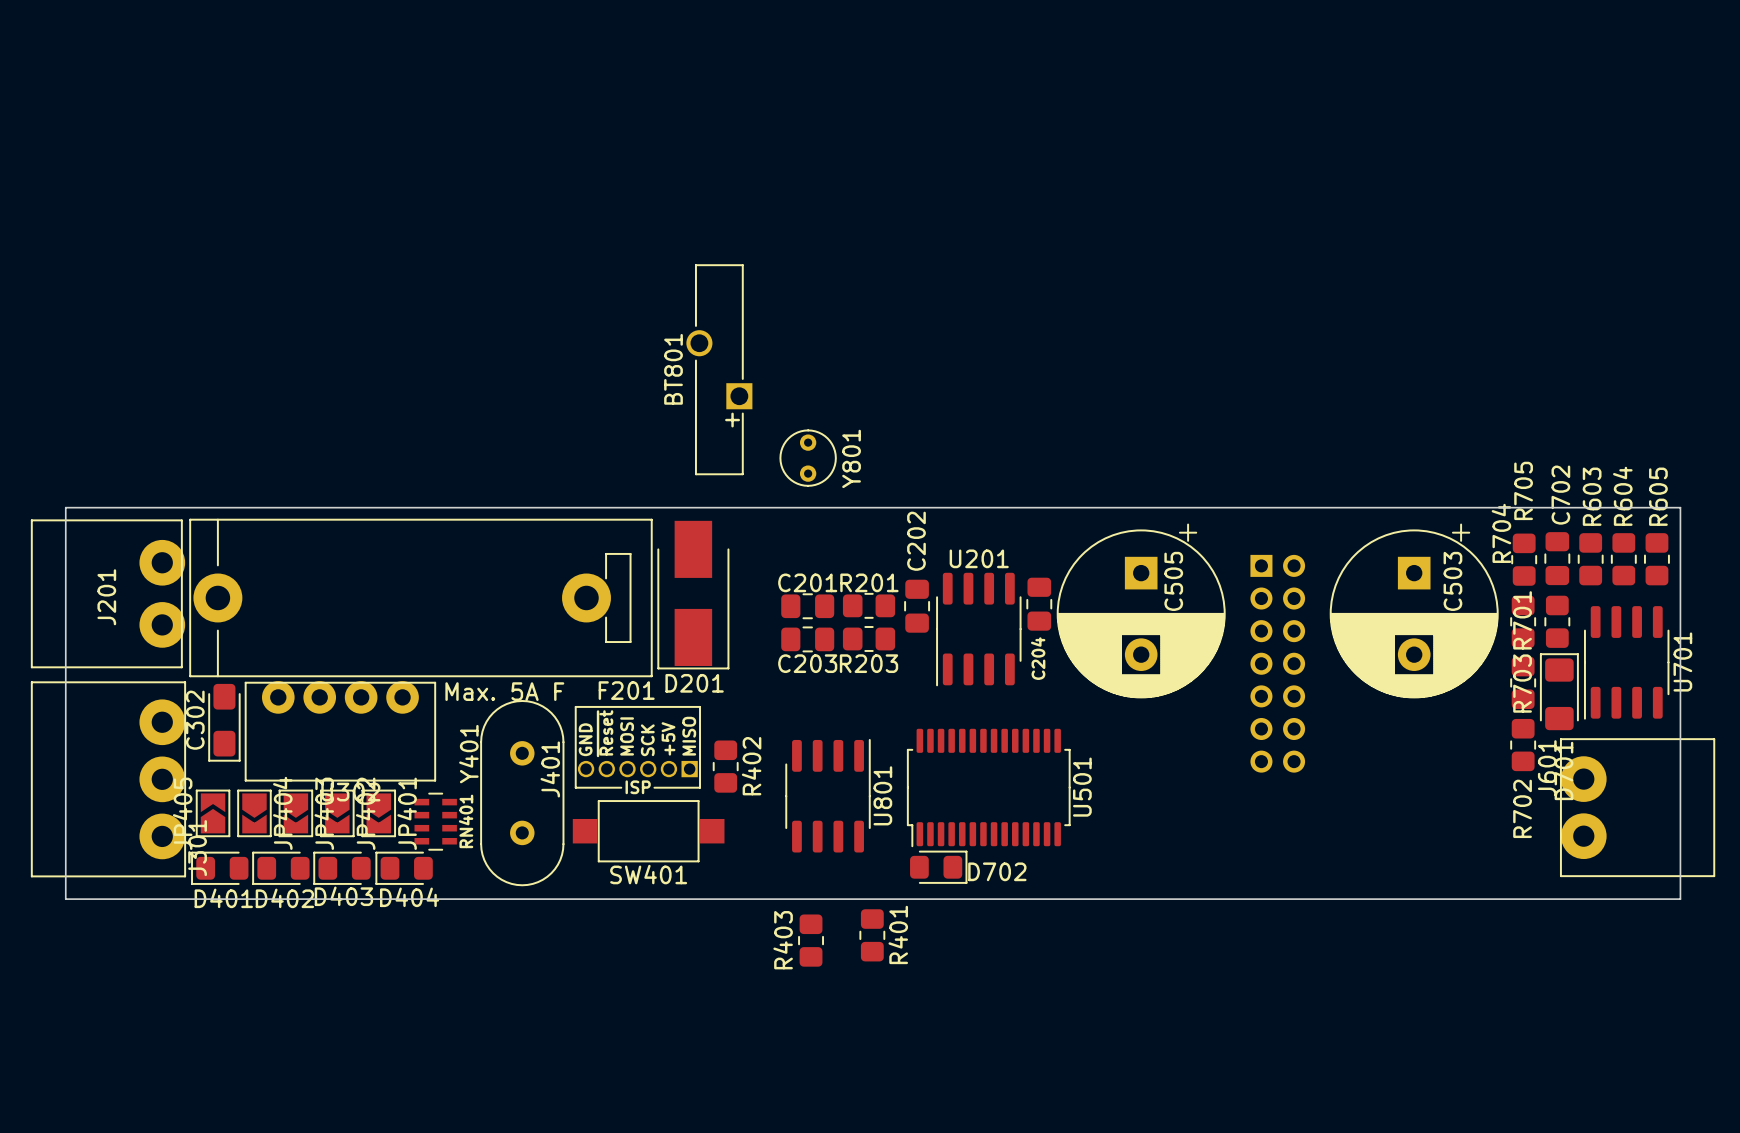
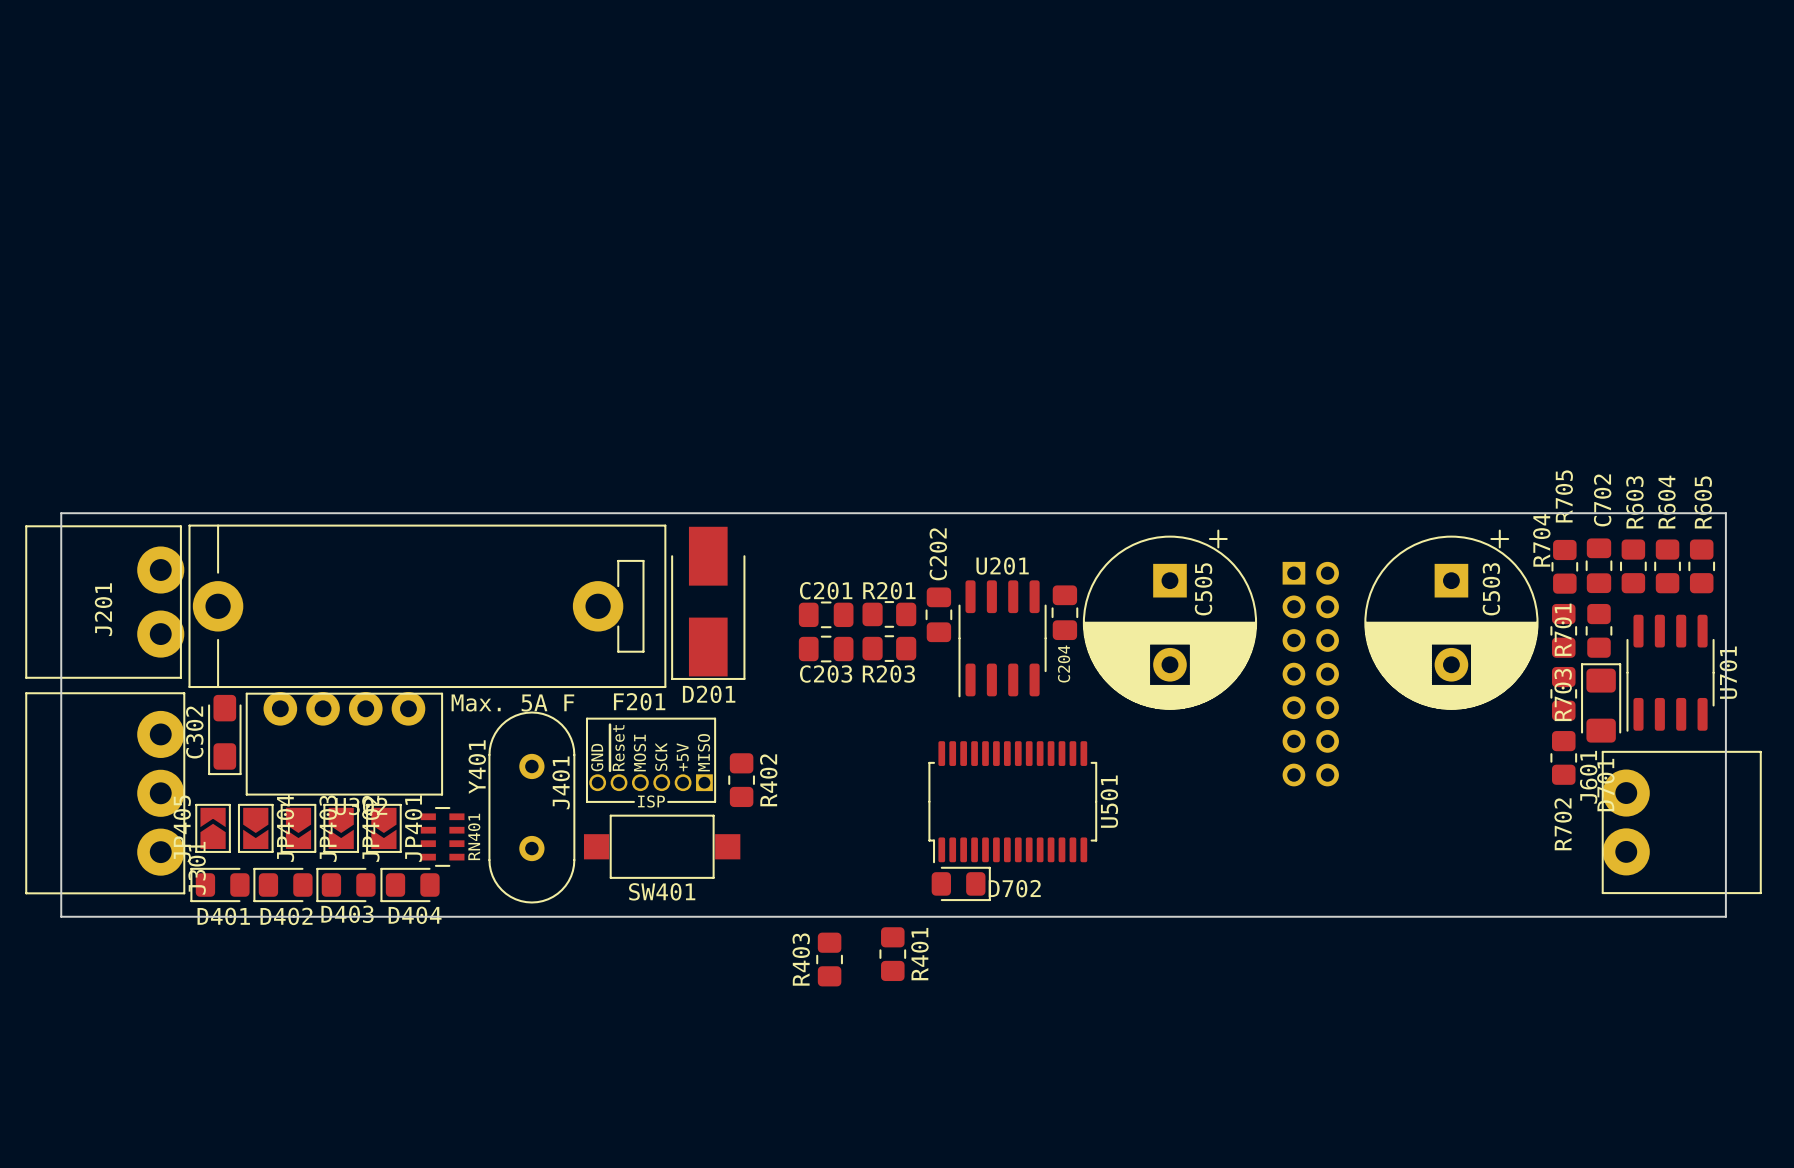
BT801: (719, 369) -> none
Y801: (808, 458) -> none
U801: (828, 795) -> none

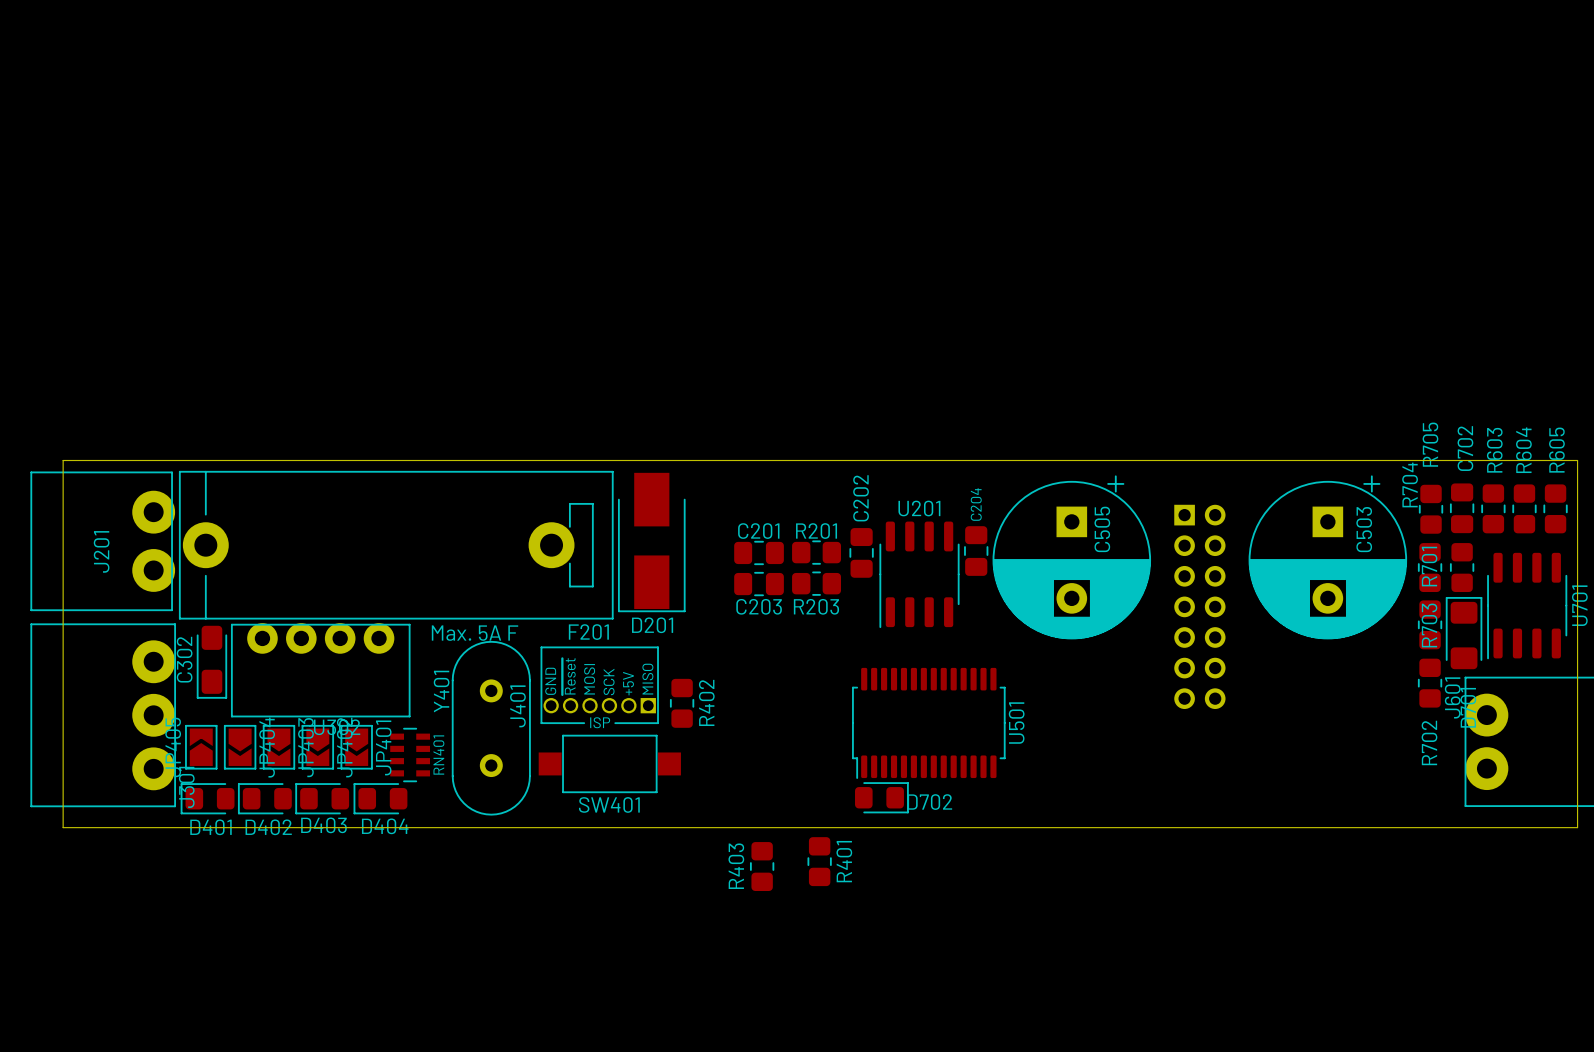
C204 name position: C204 (1064, 664) -> C204 (976, 504)

